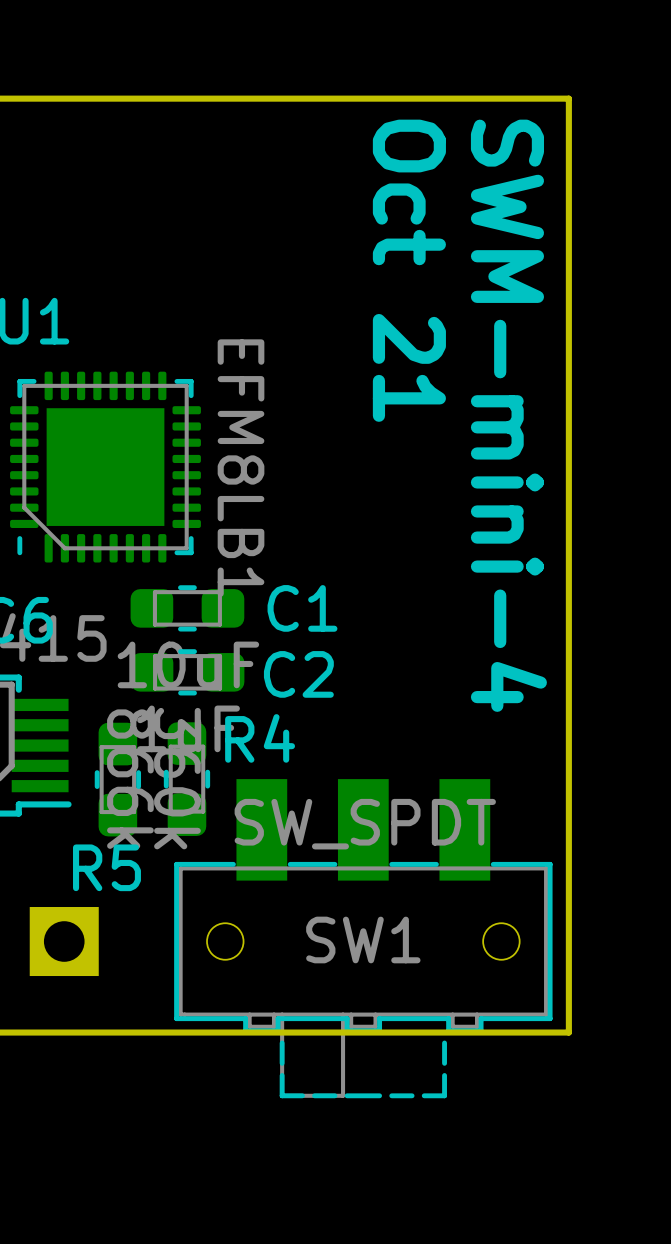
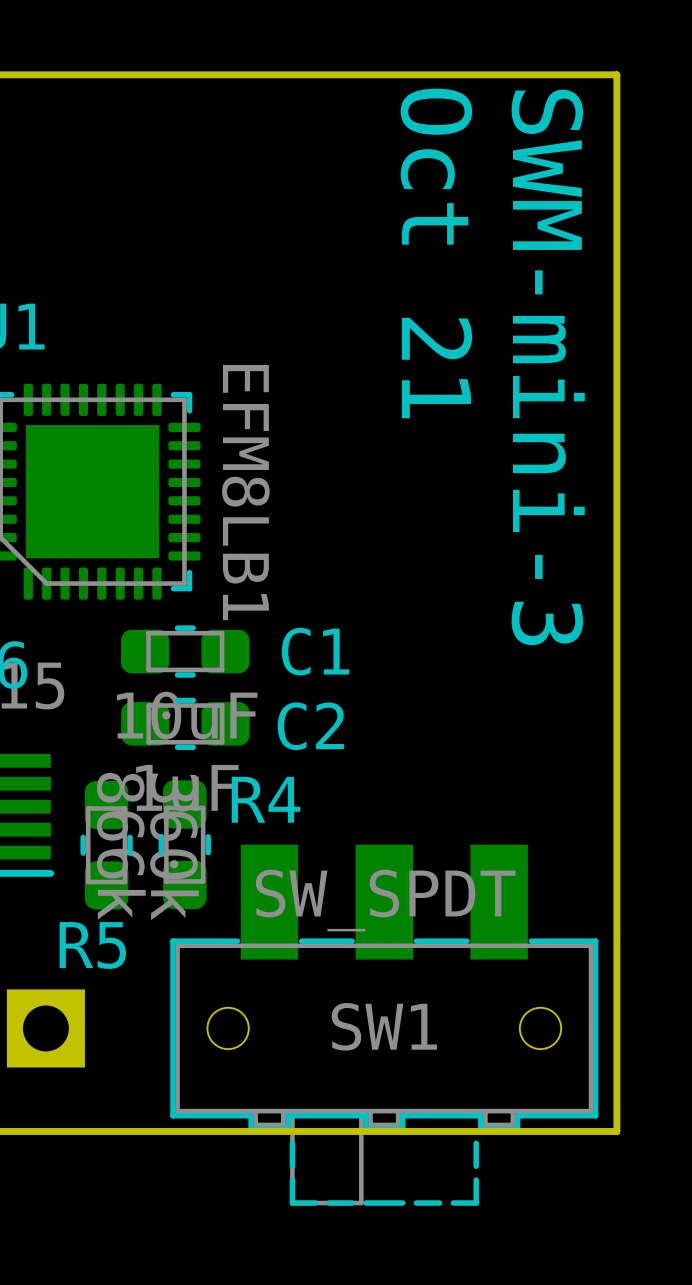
text: SWM-mini-4 (508, 415) -> SWM-mini-3 (548, 367)

